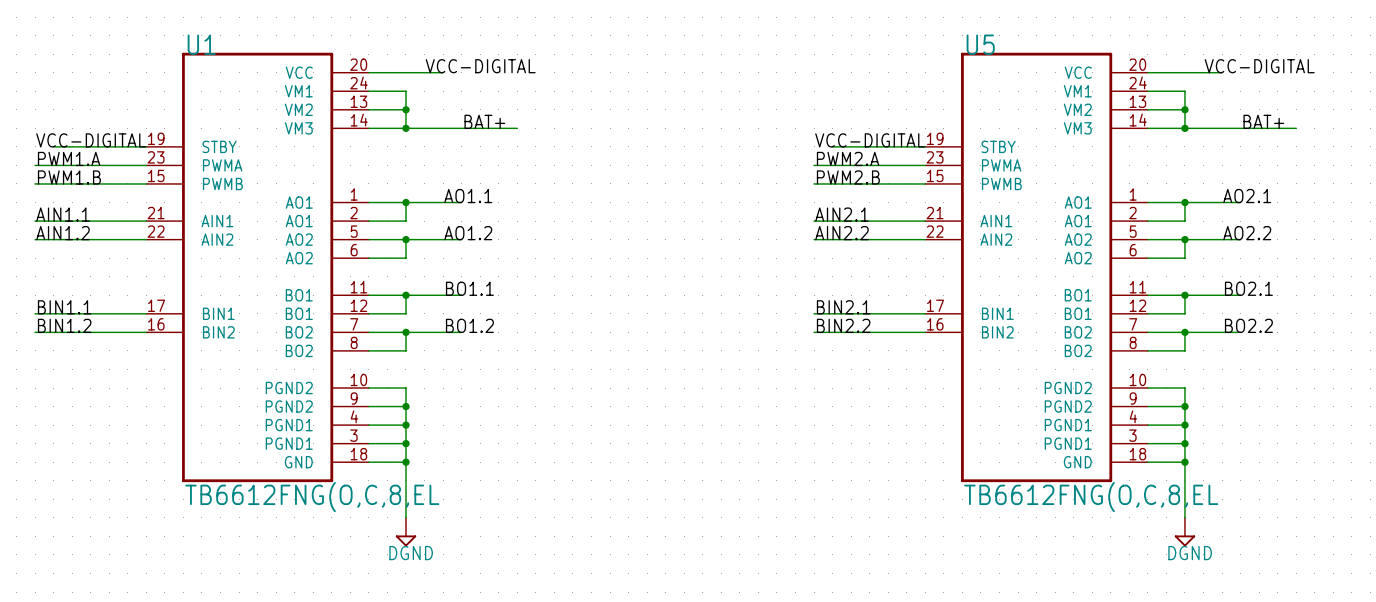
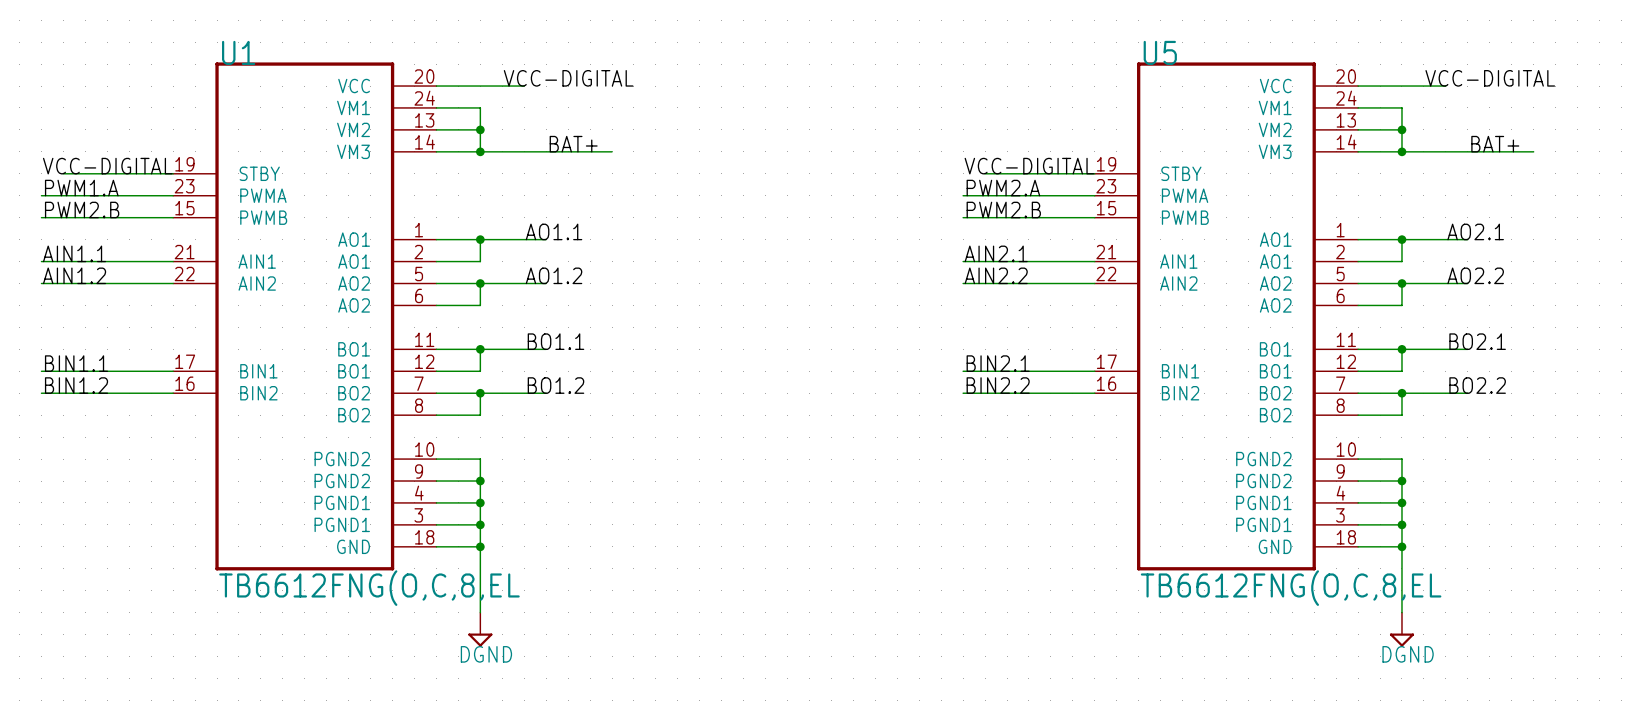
label: PWM1.B (69, 177) -> PWM2.B (82, 210)

